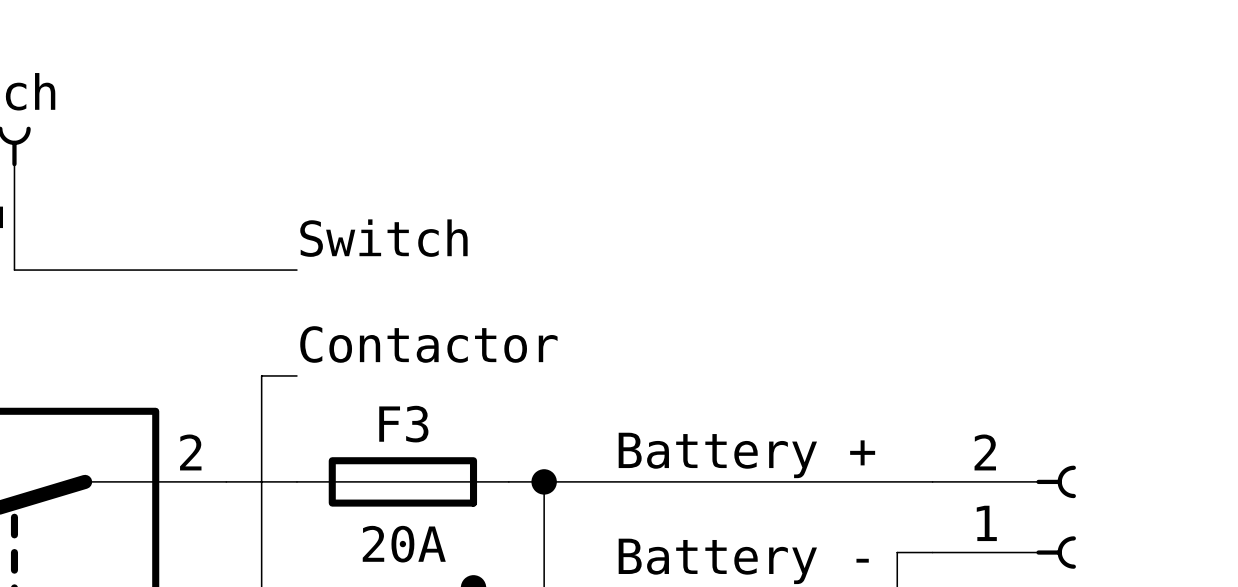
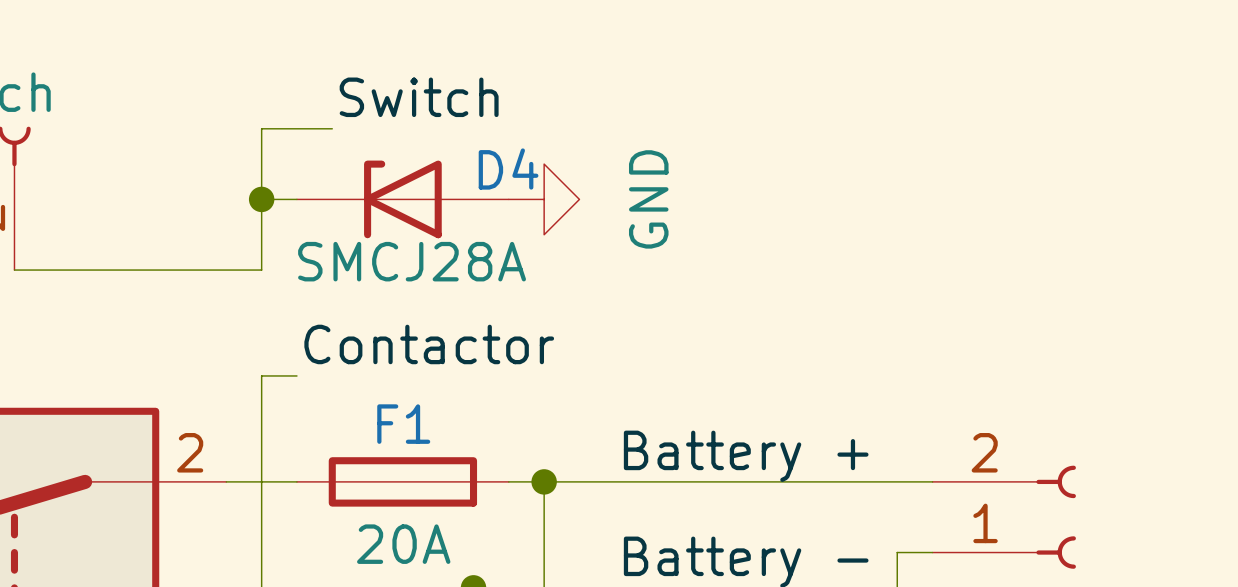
wire: none -> (261, 199) (296, 199)
junction: none -> (261, 199)
D4: none -> SMCJ28A (402, 199)
power symbol: none -> GND (544, 199)
label position: Switch (383, 238) -> Switch (419, 97)
wire: (261, 270) (296, 270) -> (261, 270) (261, 128) (332, 128)
F3 name: F3 (403, 424) -> F1 (403, 424)

